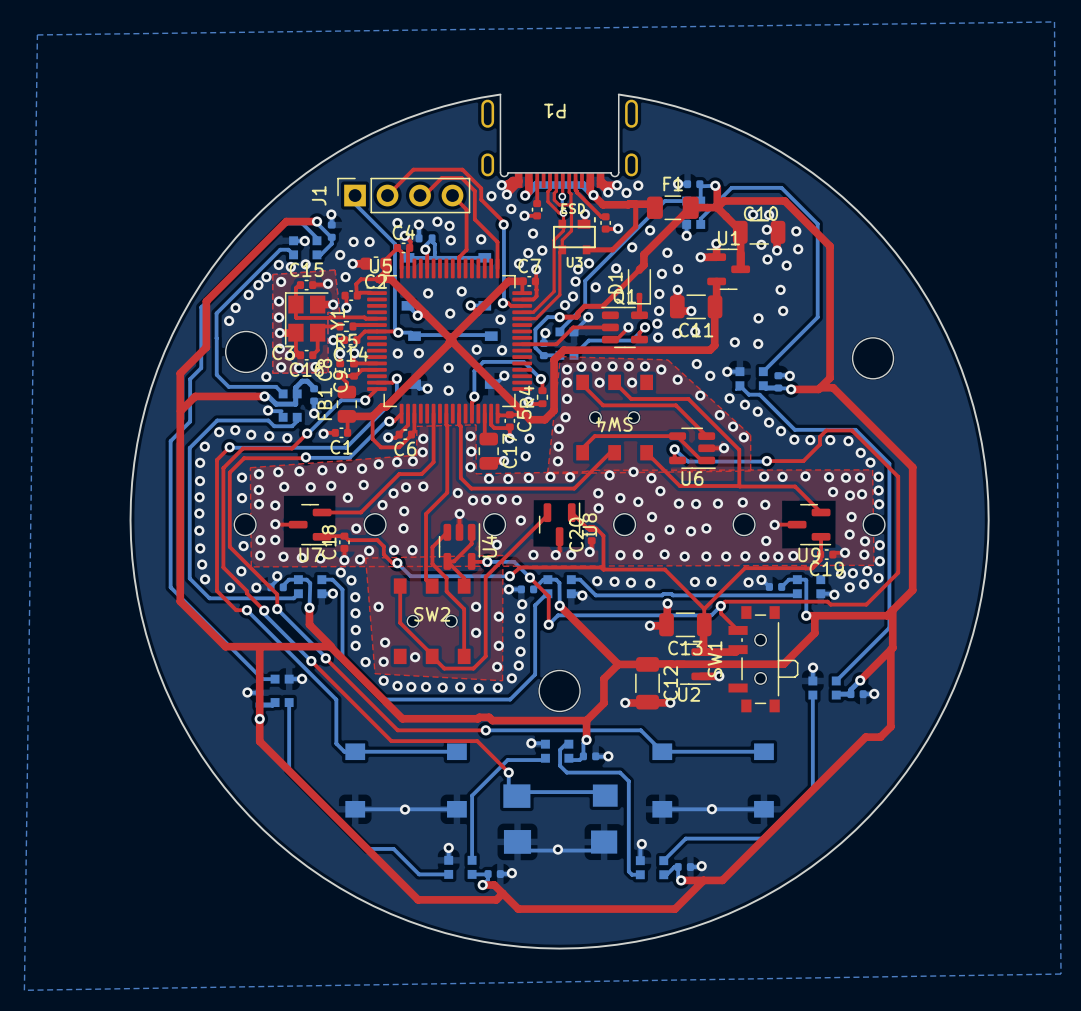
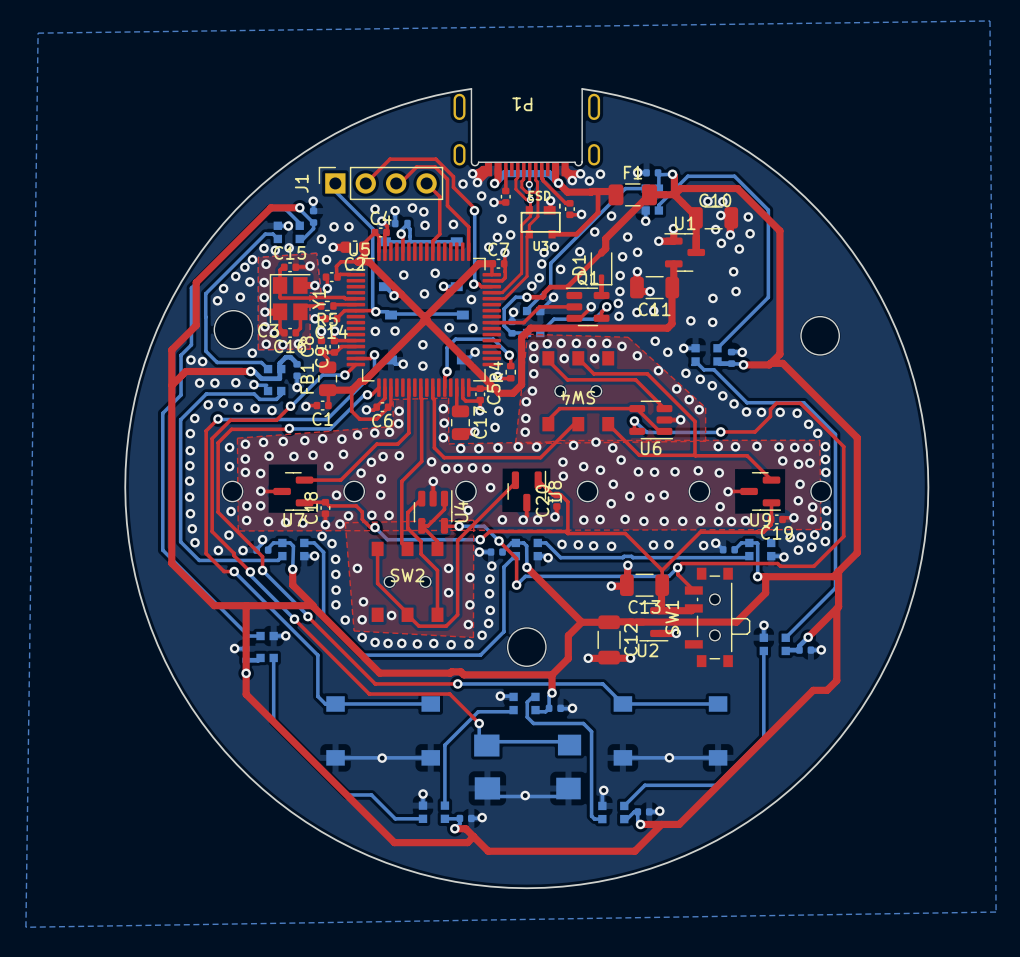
via: none -> (249, 281)
via: none -> (240, 297)
via: none -> (190, 360)
via: none -> (202, 361)
via: none -> (199, 383)
via: none -> (214, 383)
via: none -> (235, 382)

